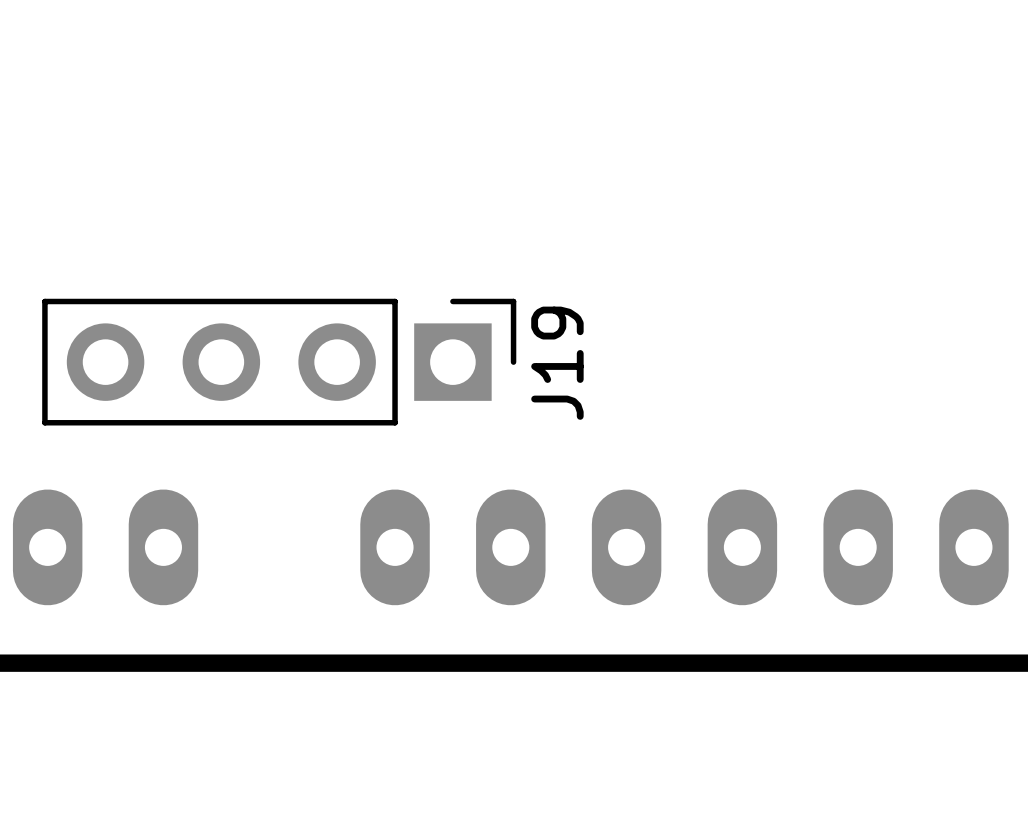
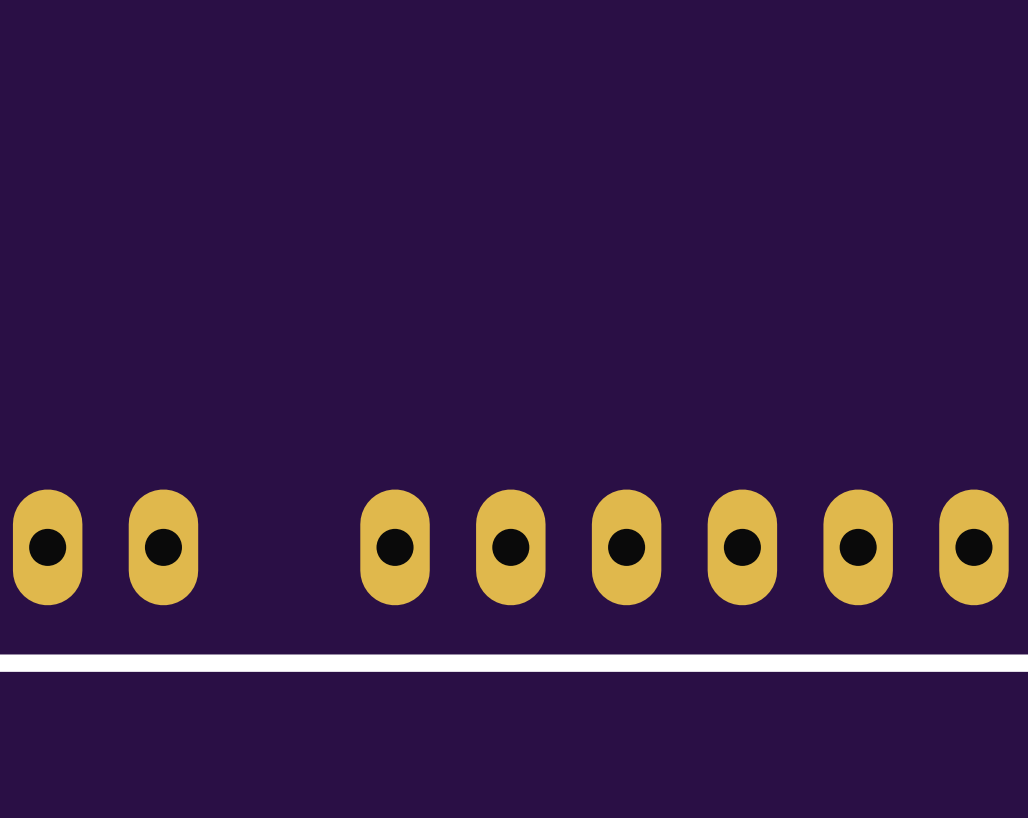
J19: (279, 362) -> none

